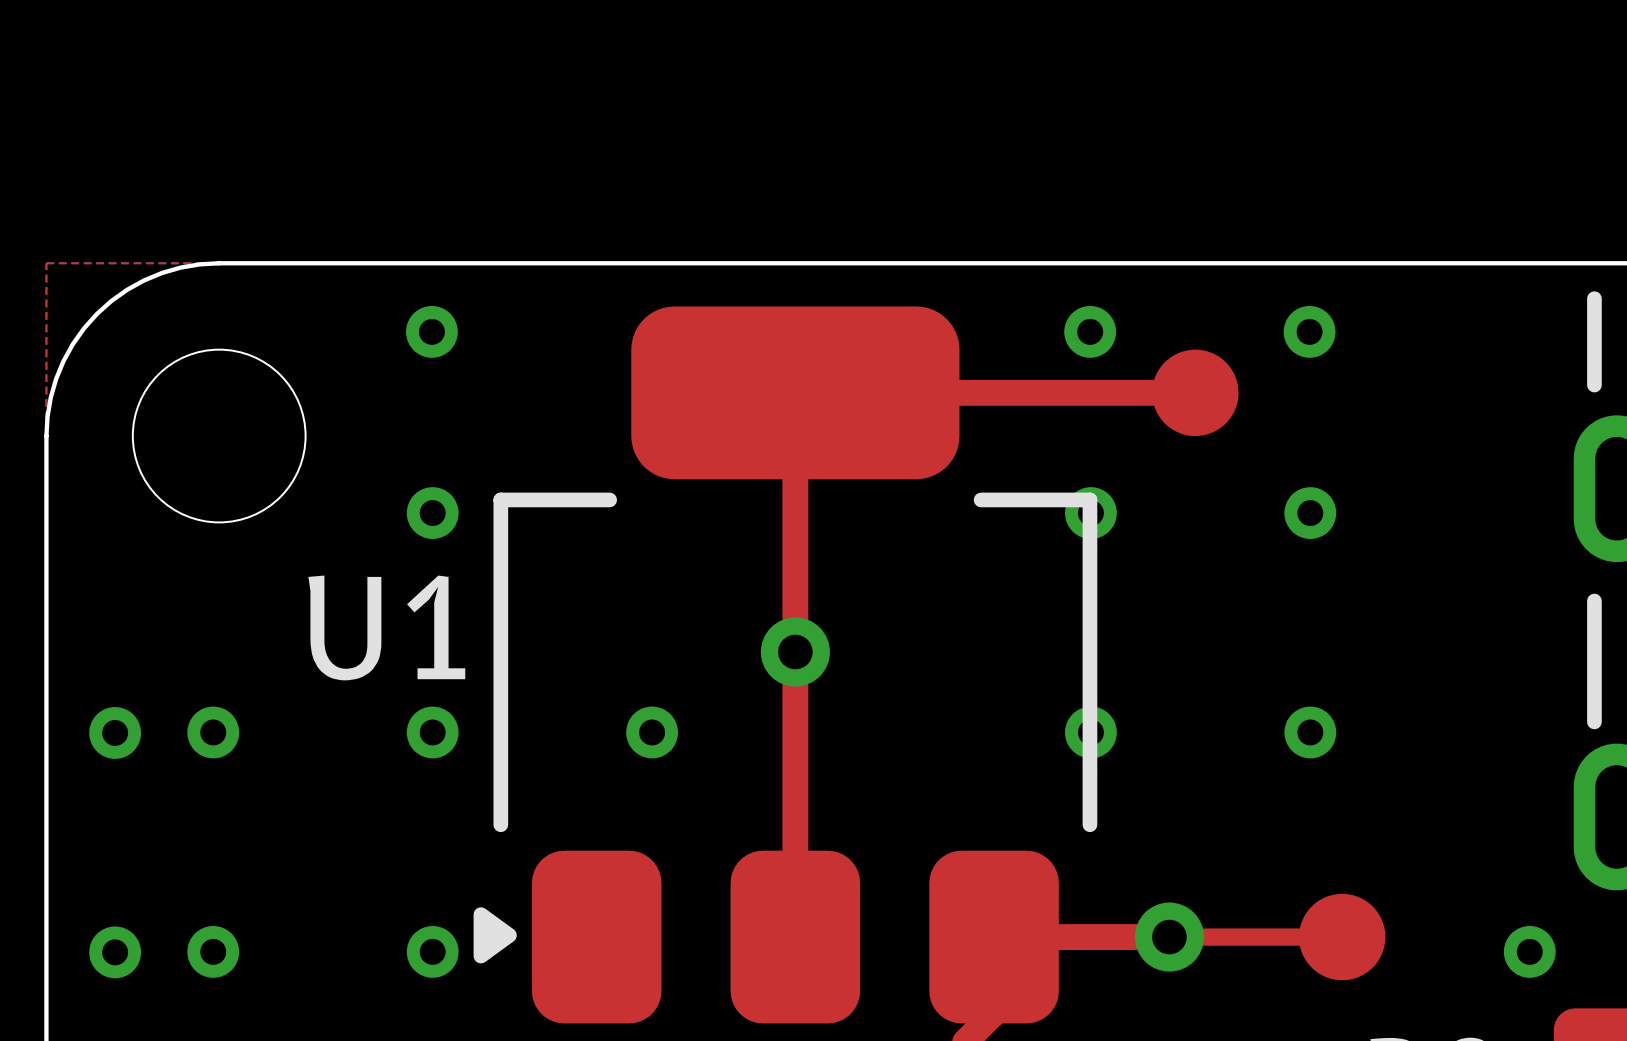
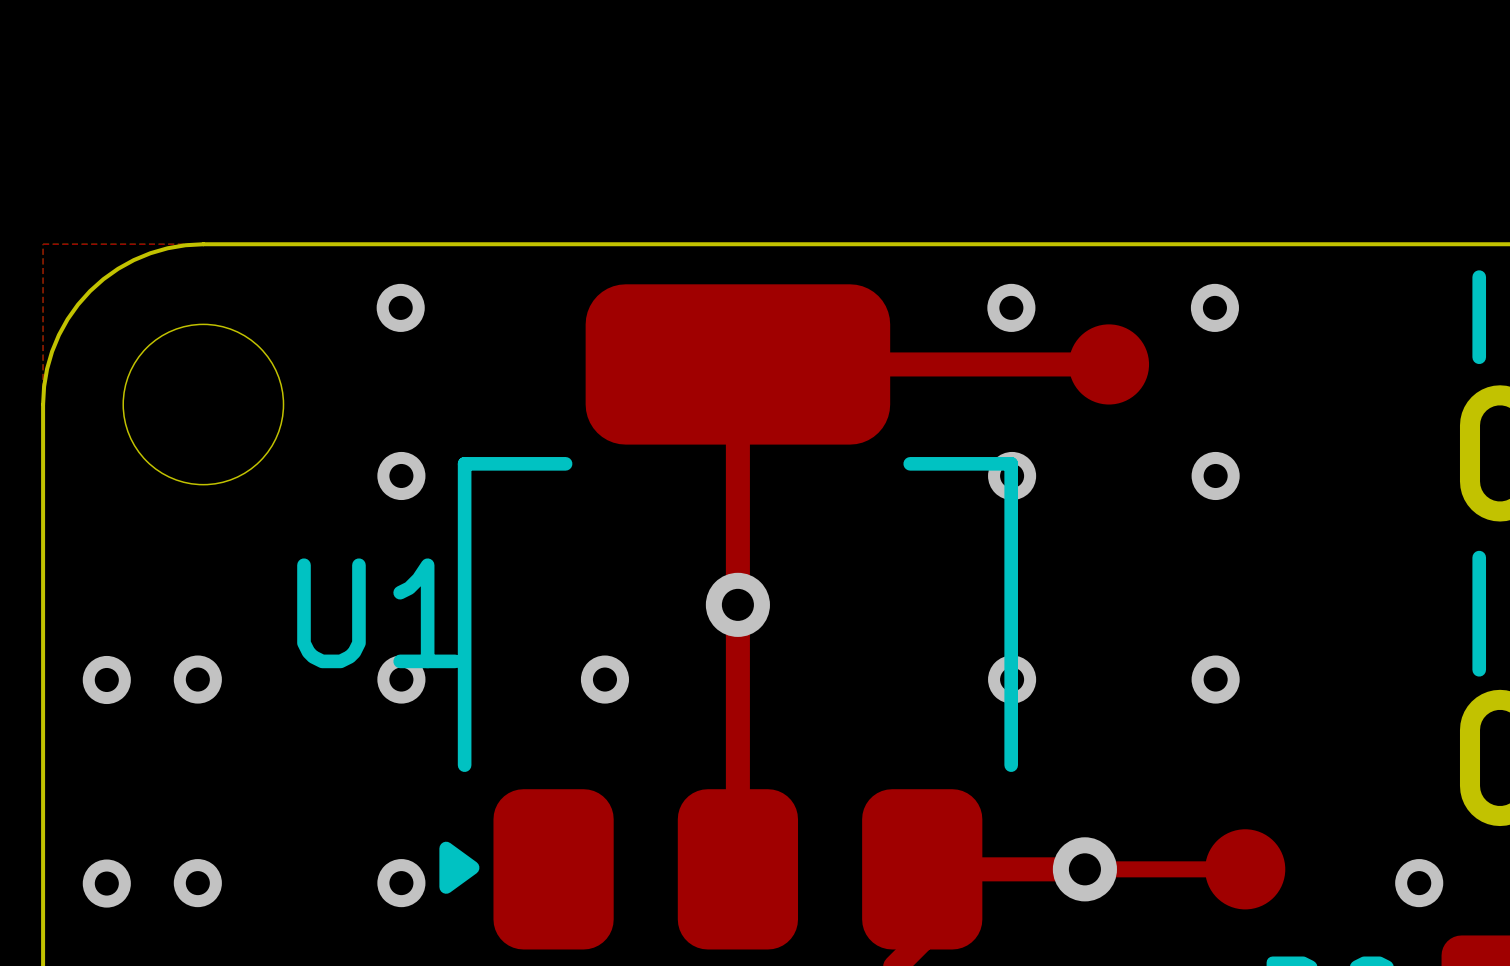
U1 name position: U1 (386, 627) -> U1 (379, 613)

